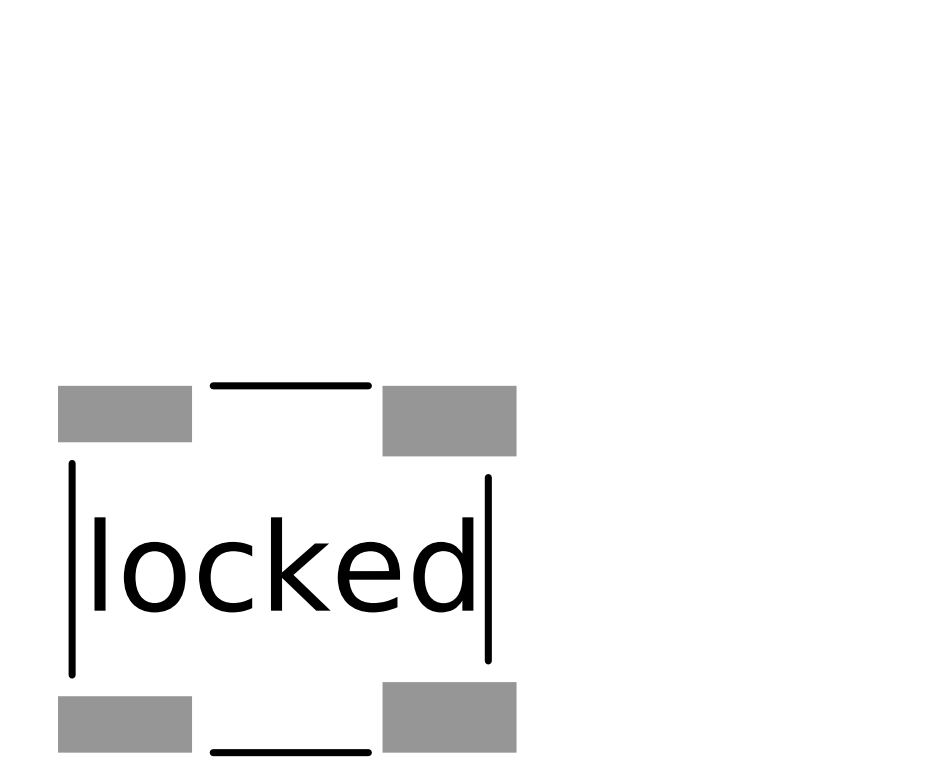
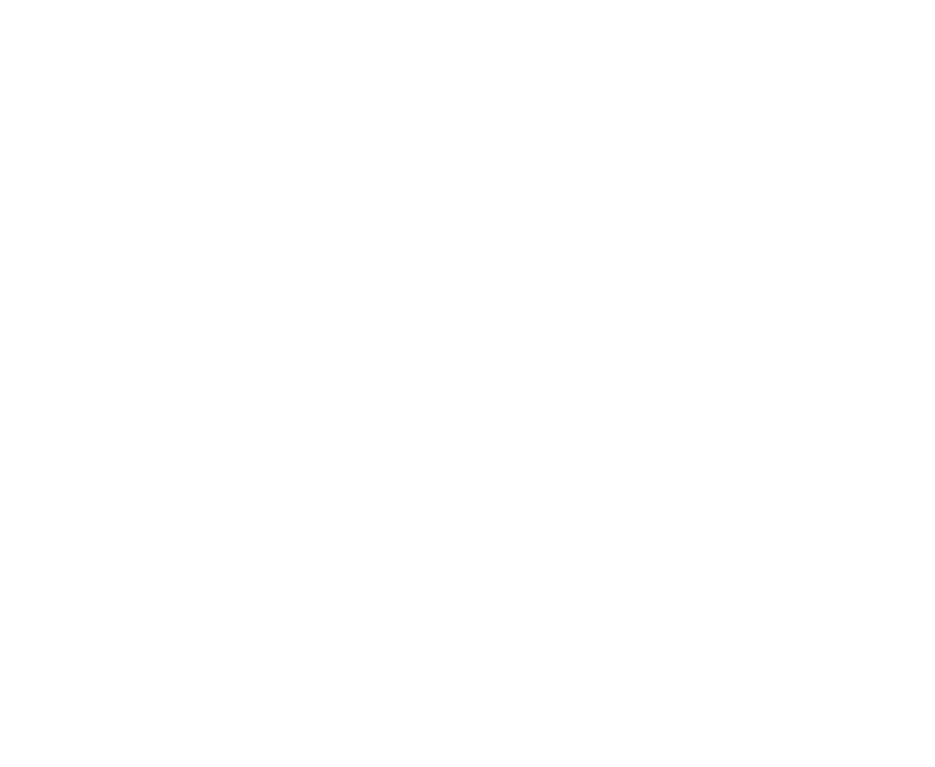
locked: (287, 569) -> none

